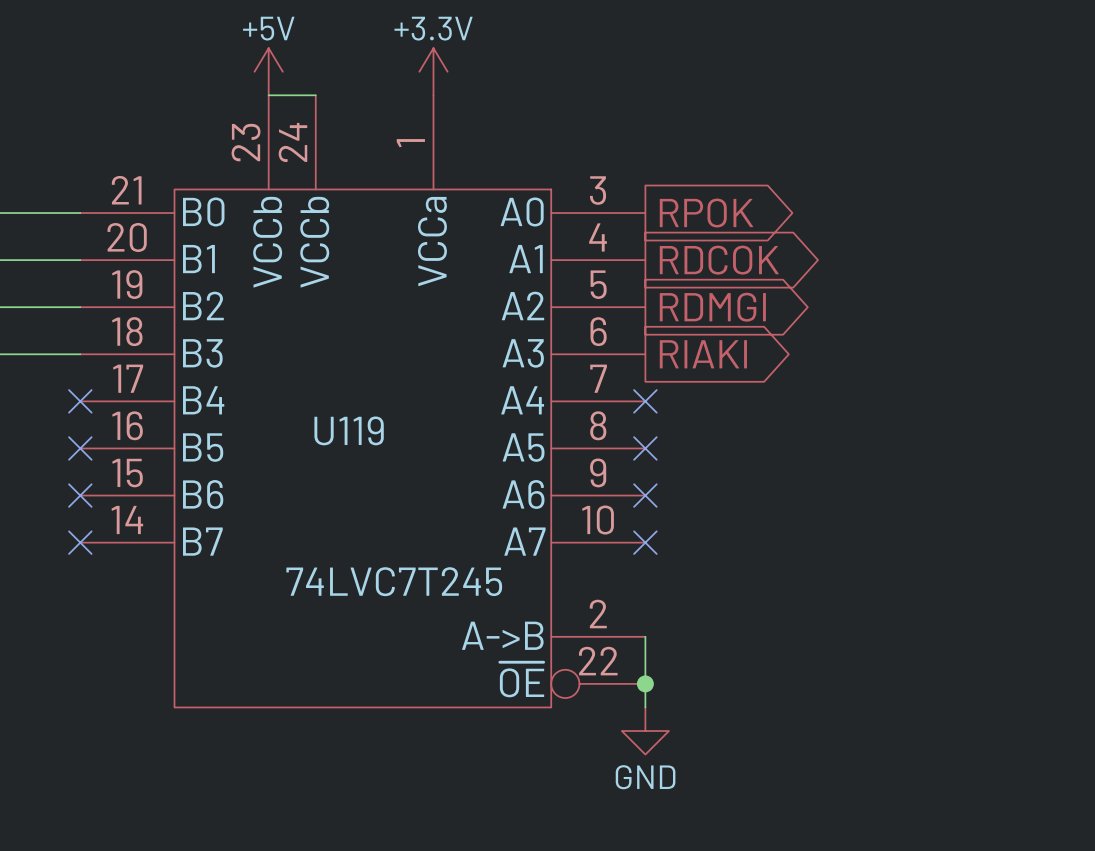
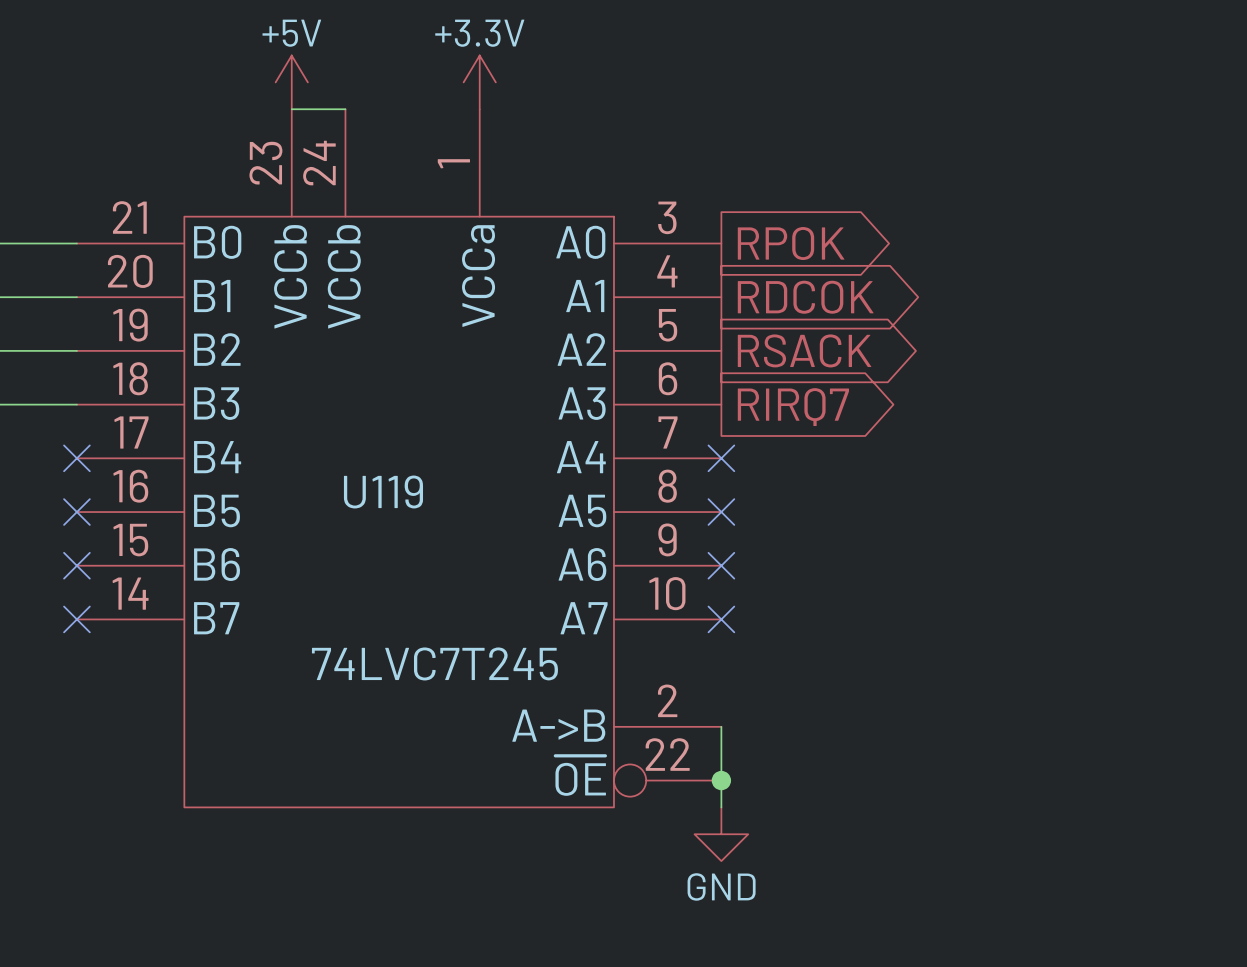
global label: RDMGI (712, 307) -> RSACK (804, 350)
global label: RIAKI (703, 354) -> RIRQ7 (793, 407)

